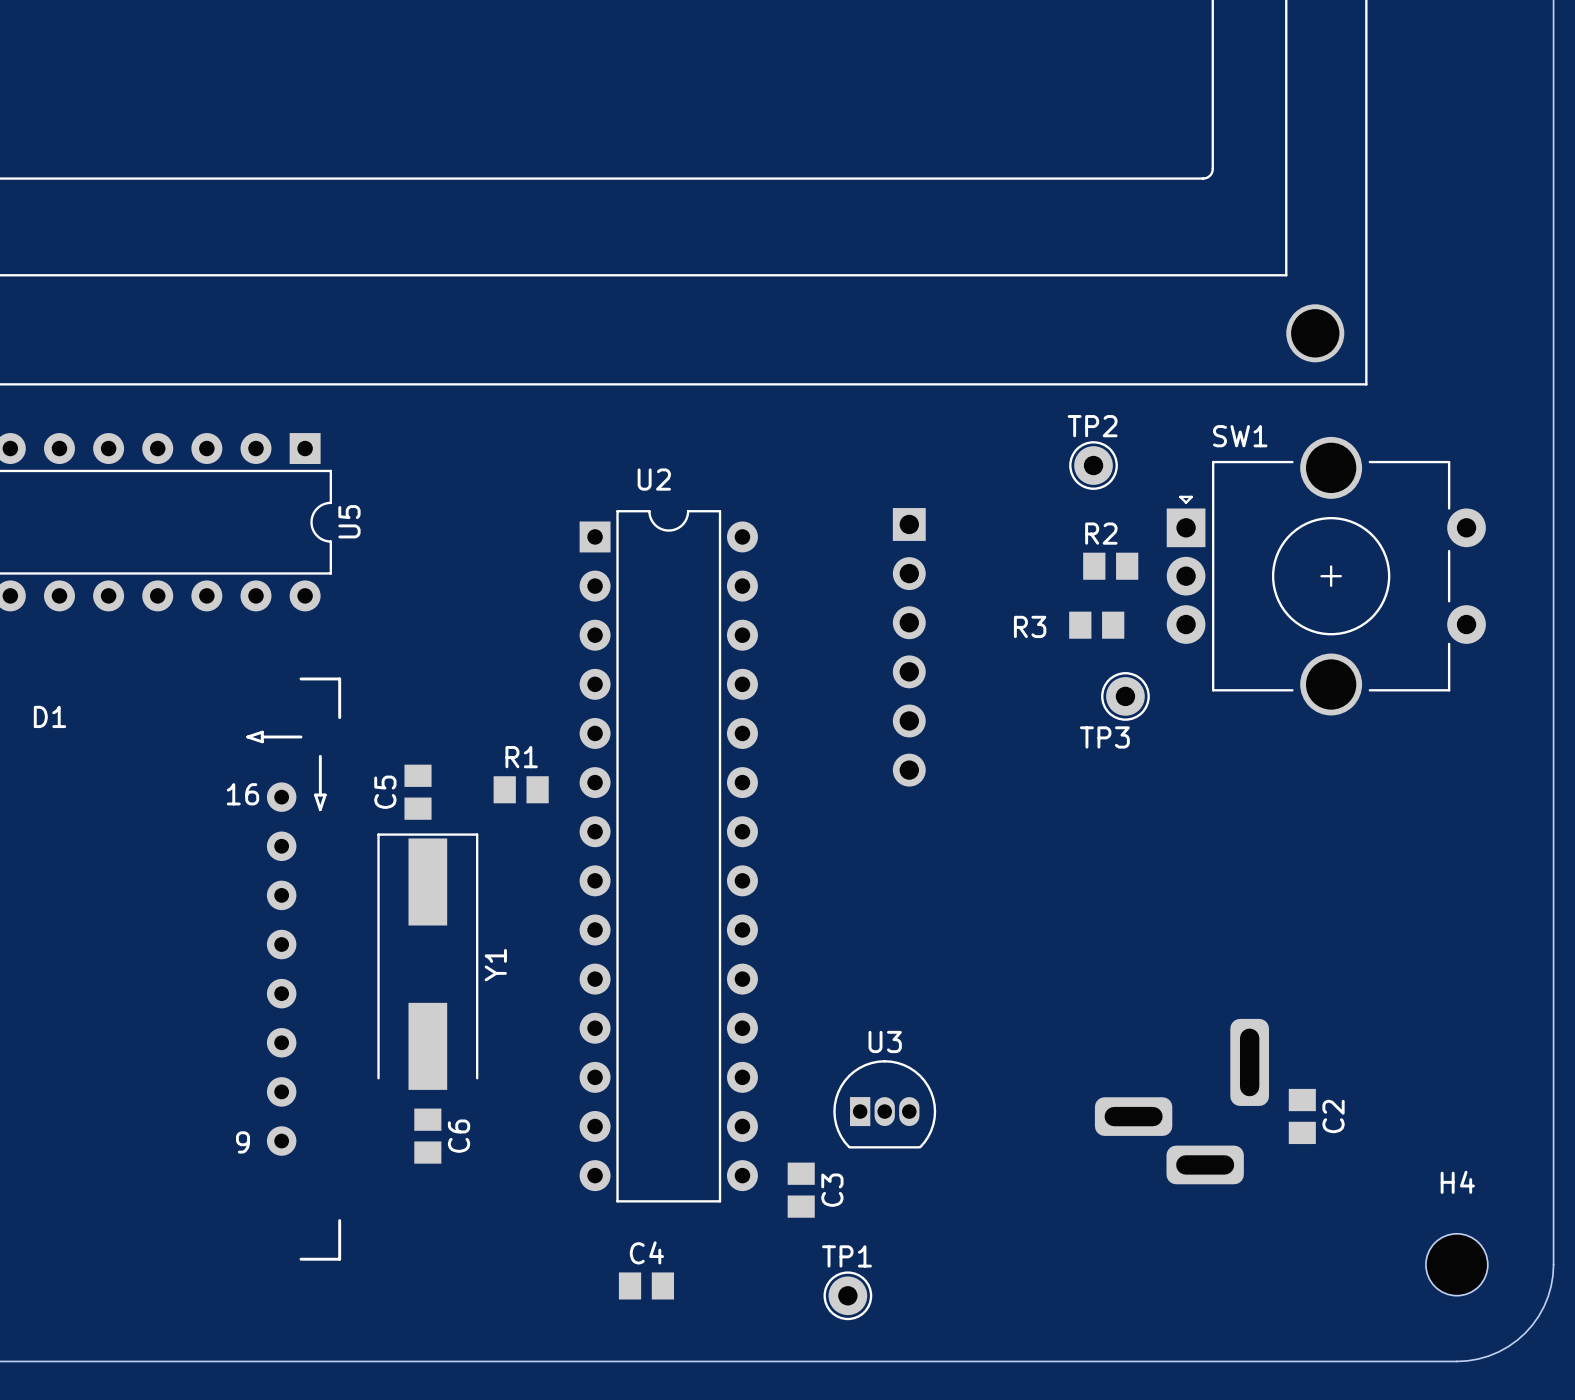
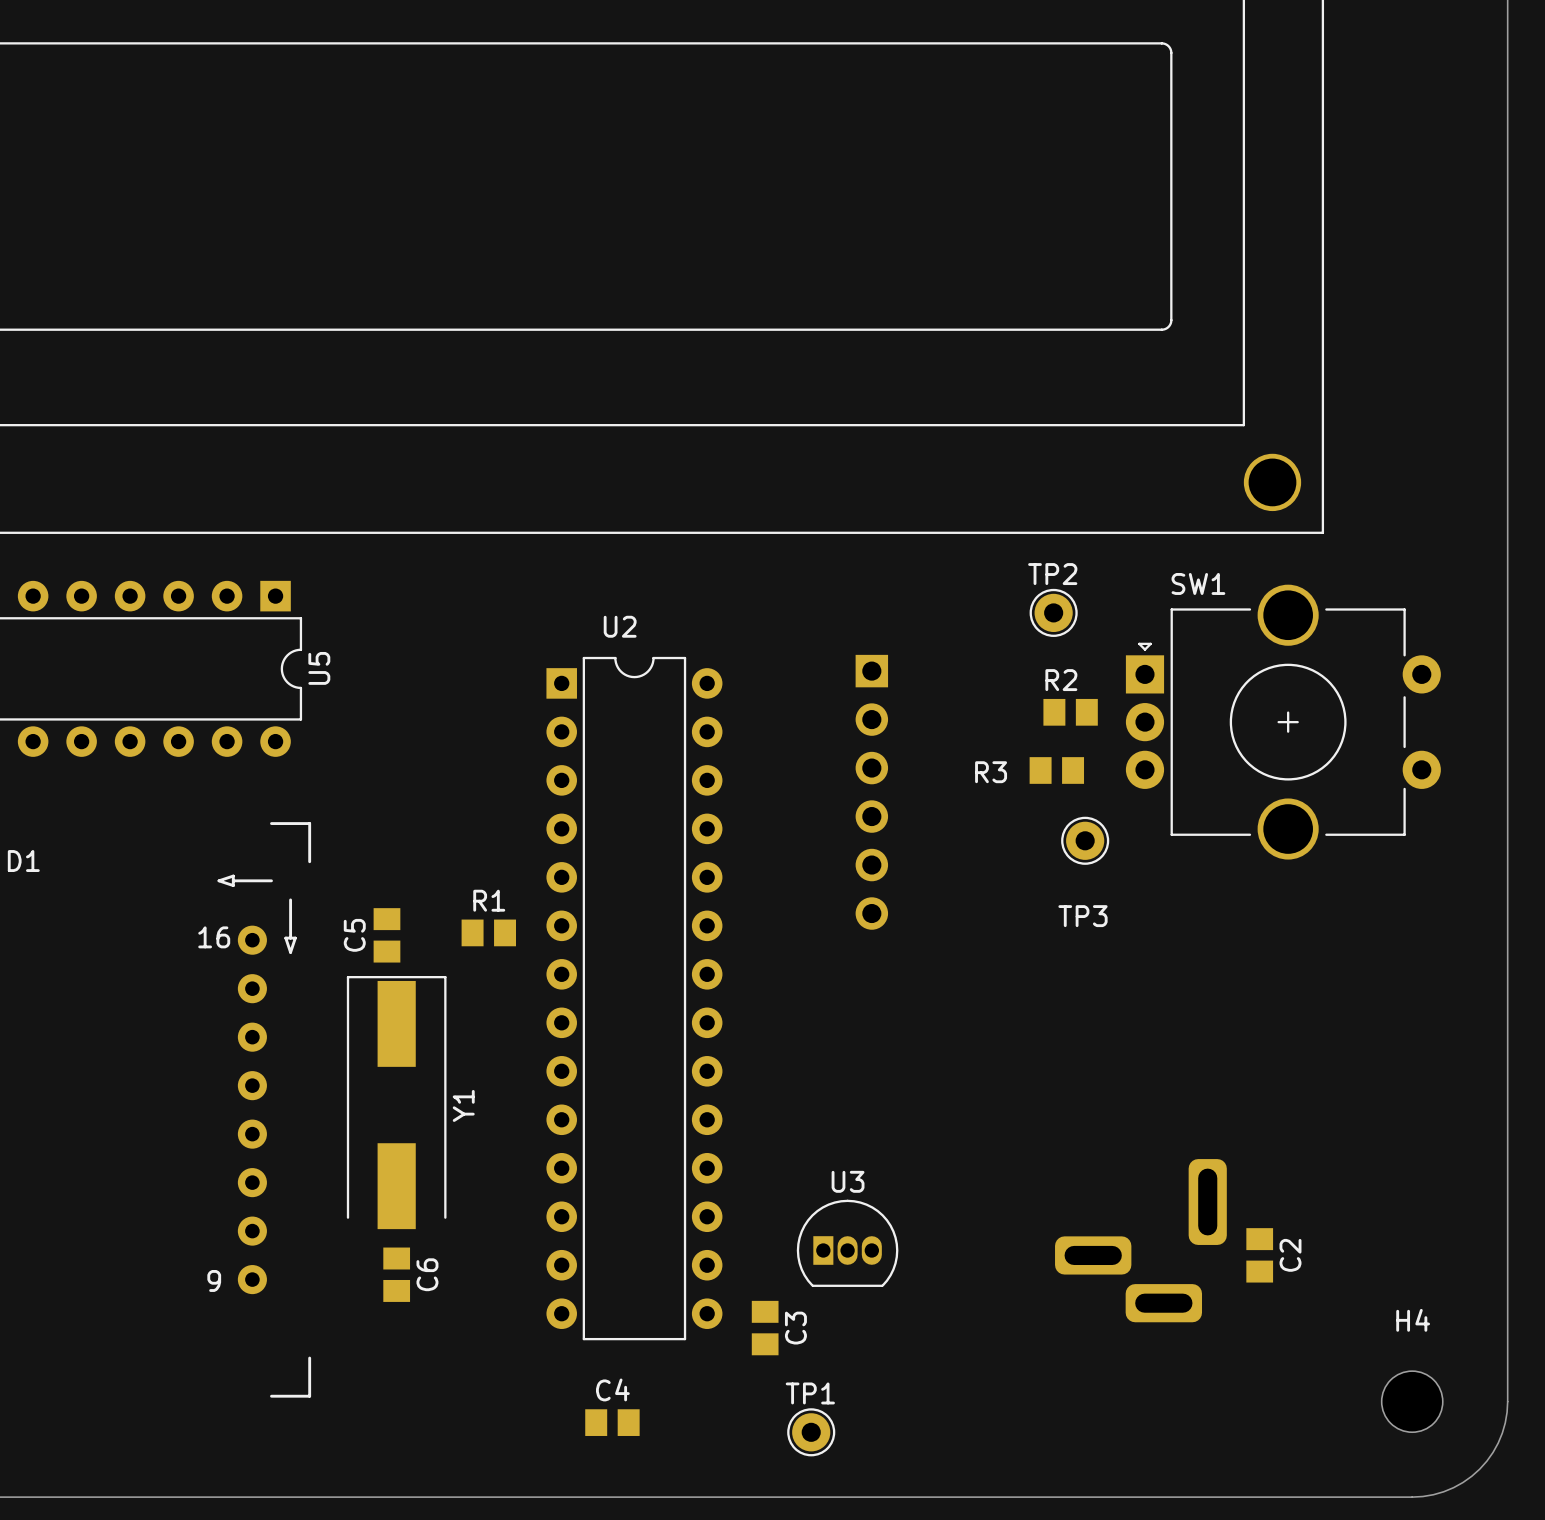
TP3 name position: TP3 (1104, 737) -> TP3 (1082, 916)

